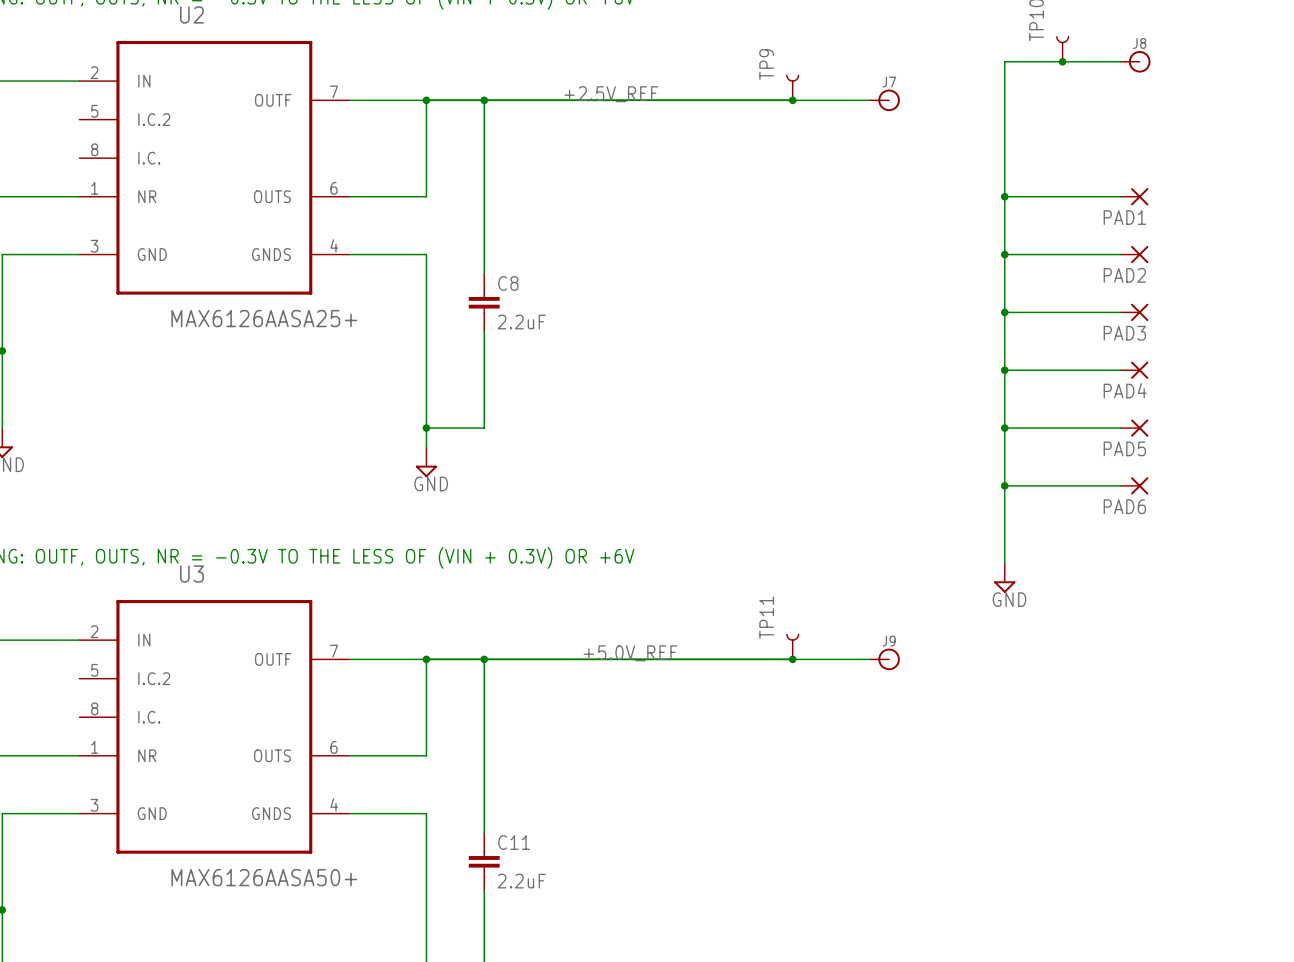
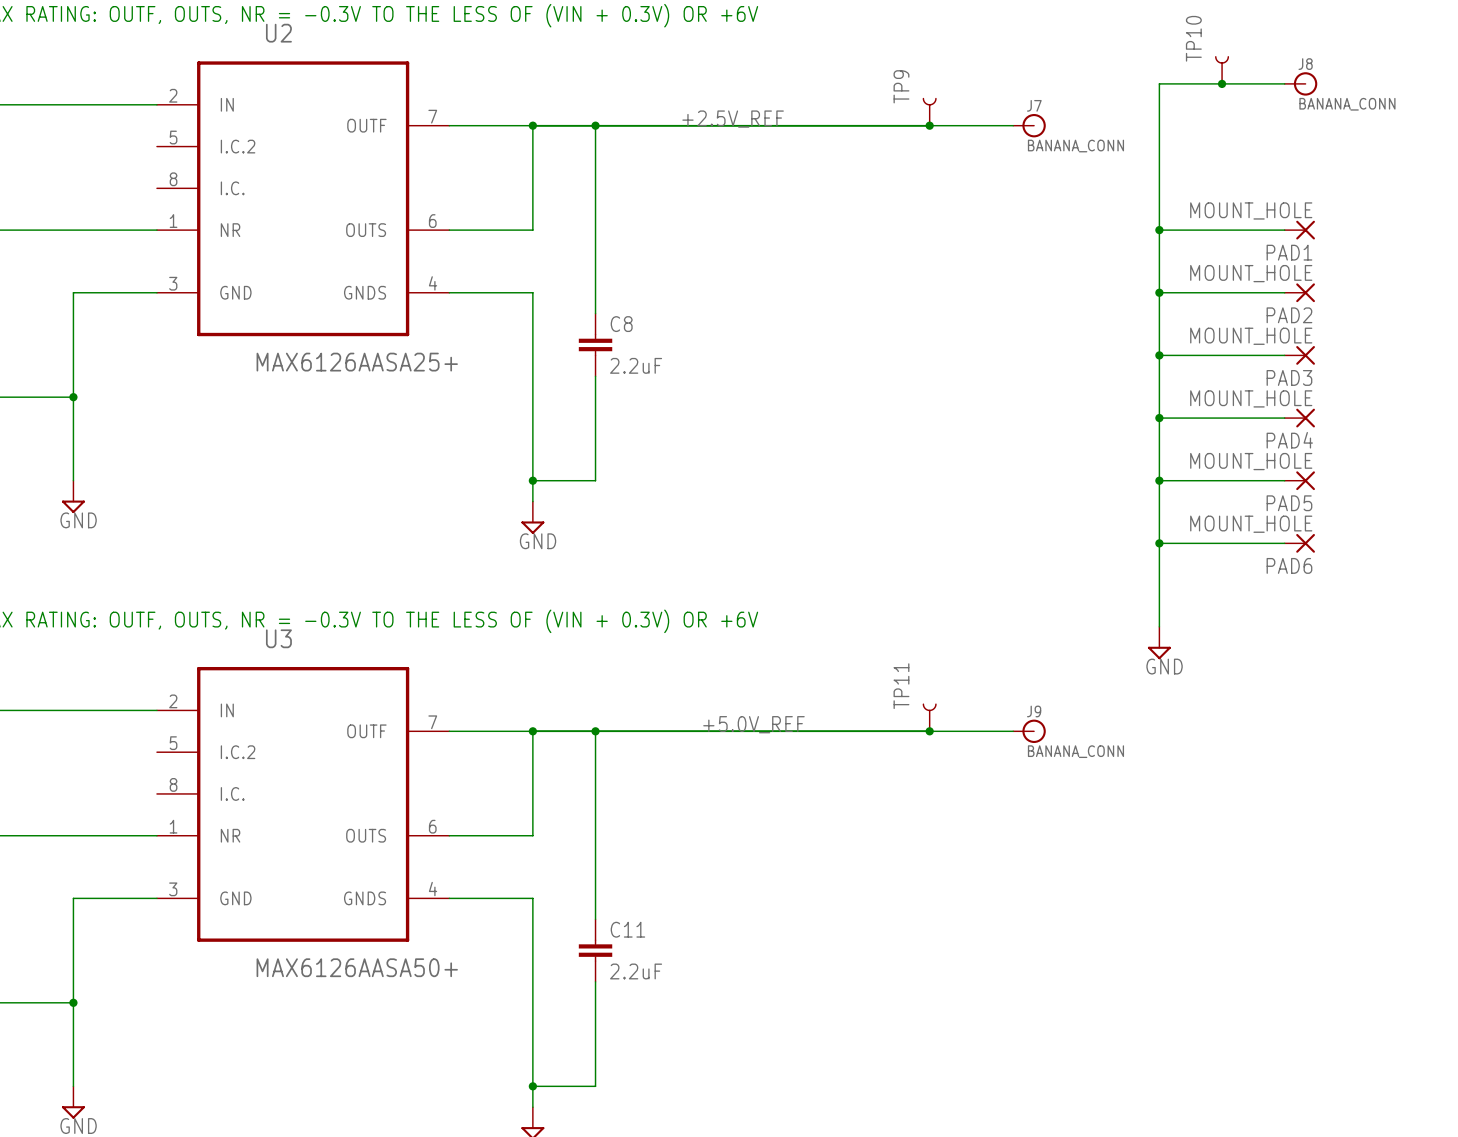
J8 value: none -> BANANA_CONN (1347, 104)
J7 value: none -> BANANA_CONN (1075, 146)
PAD1 value: none -> MOUNT_HOLE (1251, 210)
PAD2 value: none -> MOUNT_HOLE (1251, 273)
PAD3 value: none -> MOUNT_HOLE (1251, 336)
PAD4 value: none -> MOUNT_HOLE (1251, 398)
PAD5 value: none -> MOUNT_HOLE (1251, 461)
PAD6 value: none -> MOUNT_HOLE (1251, 524)
J9 value: none -> BANANA_CONN (1075, 751)

